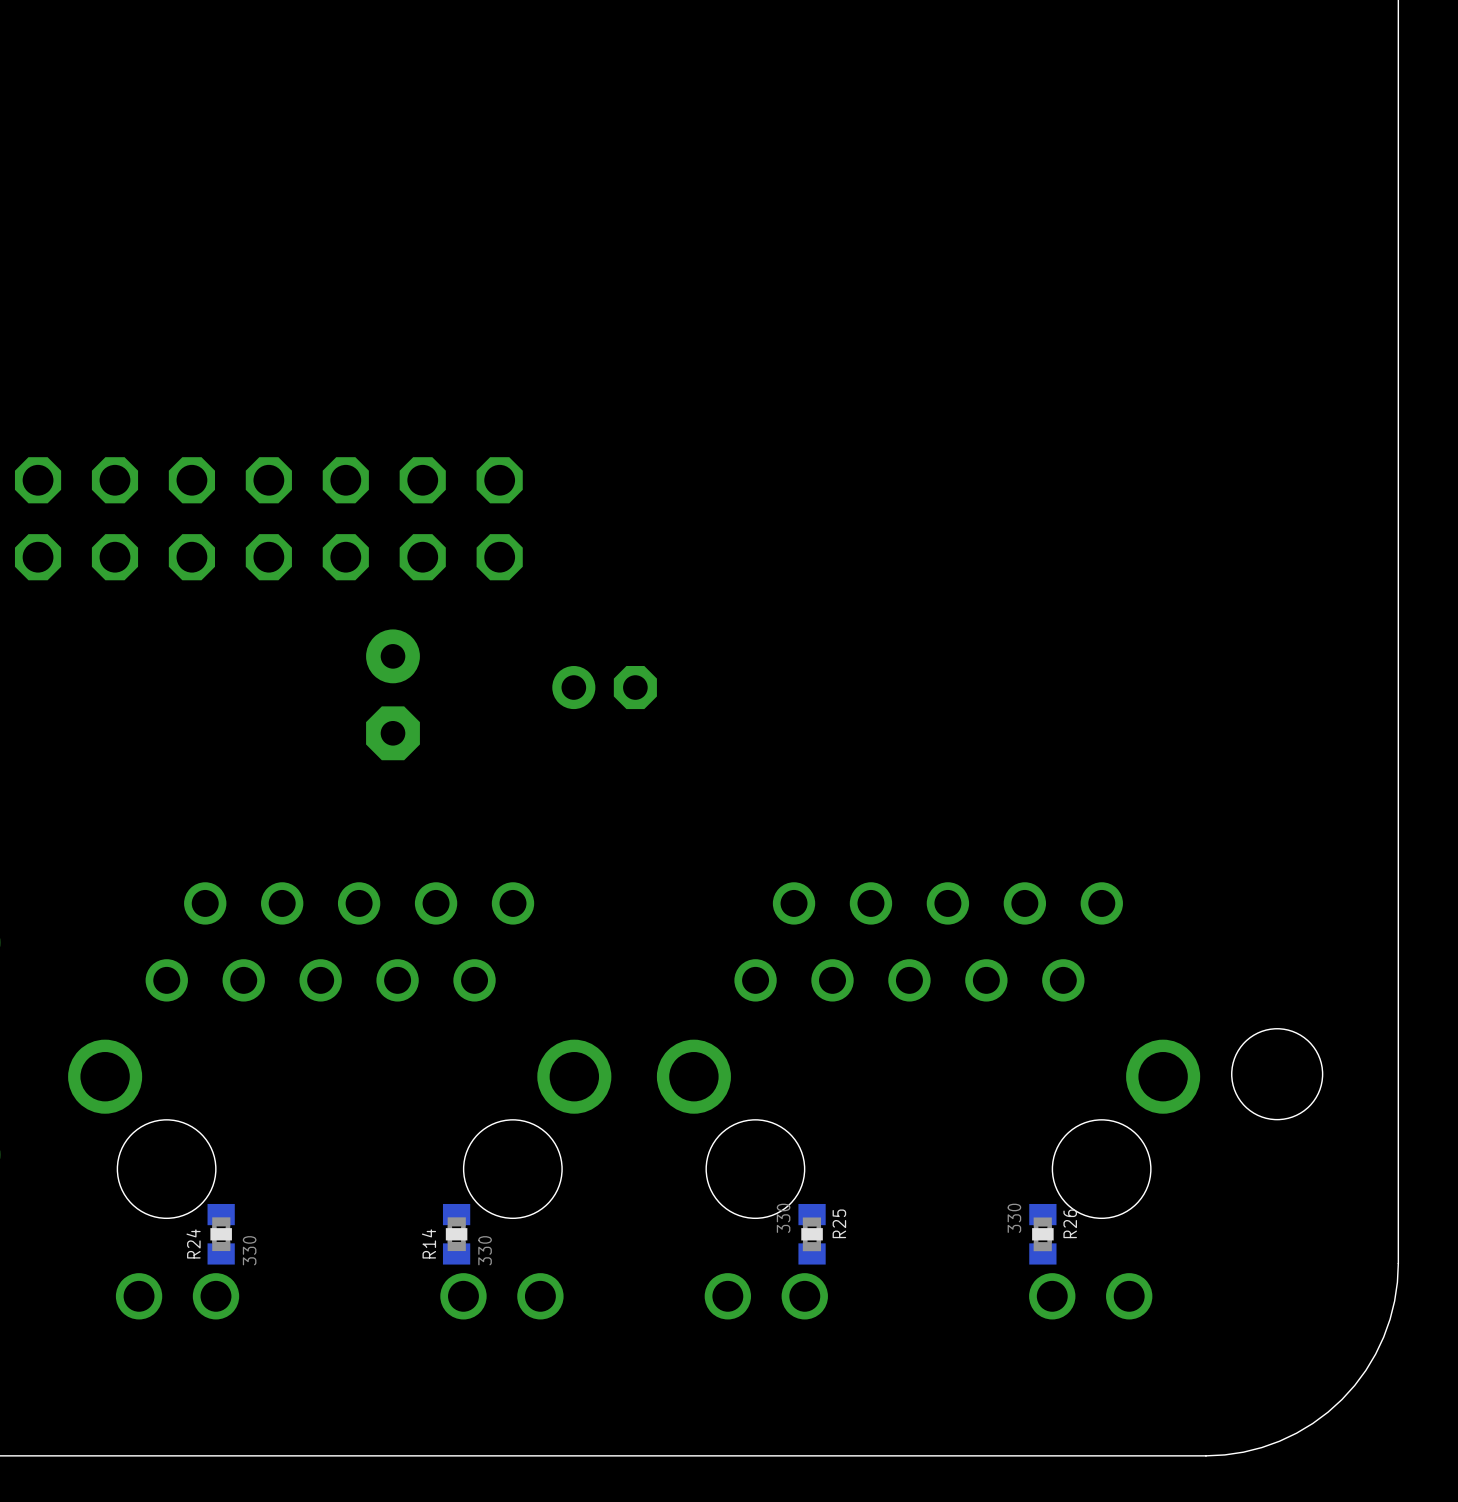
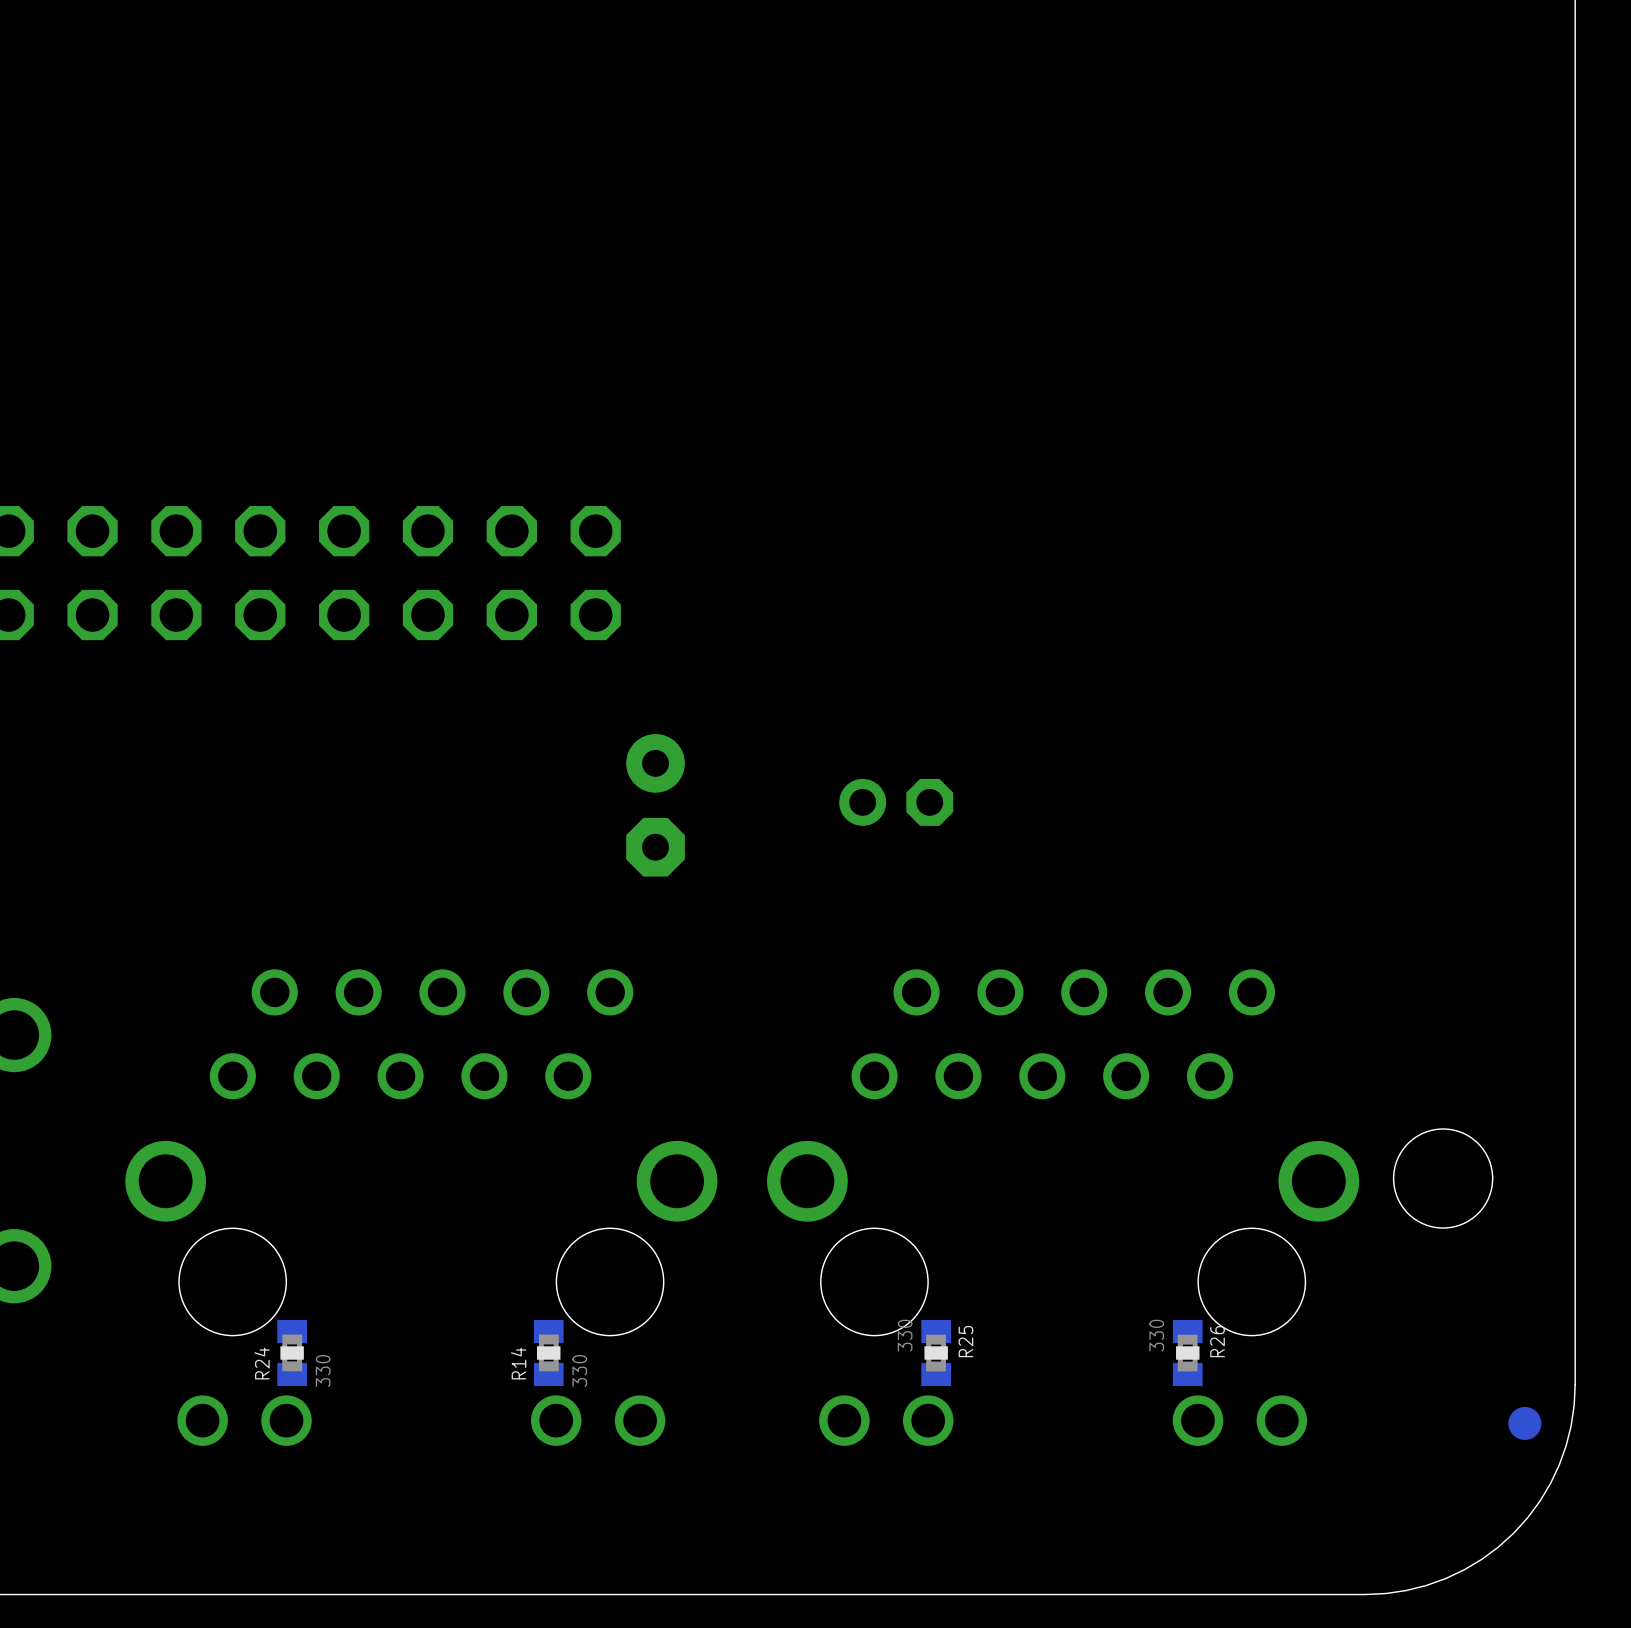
part position: (604, 687) -> (896, 802)
part position: (393, 694) -> (655, 805)
part: none -> (1524, 1423)

